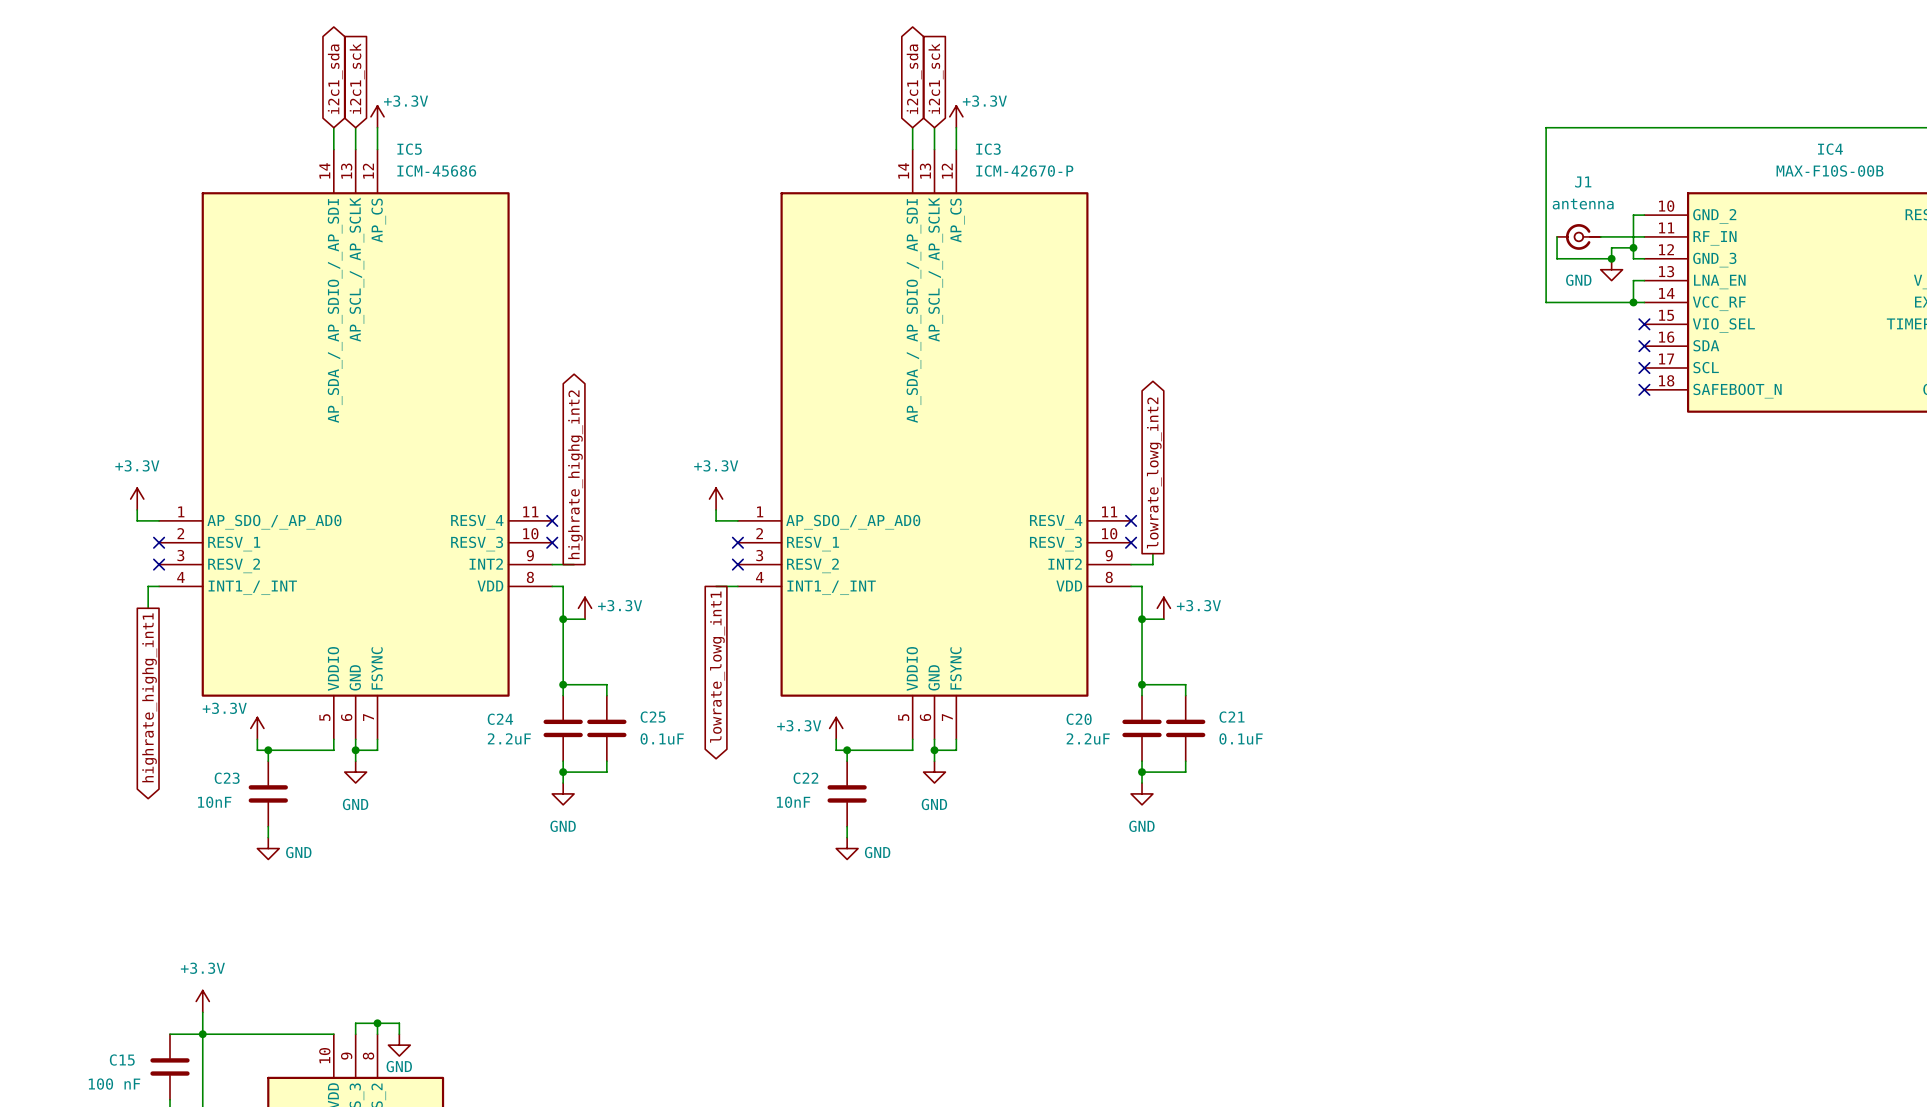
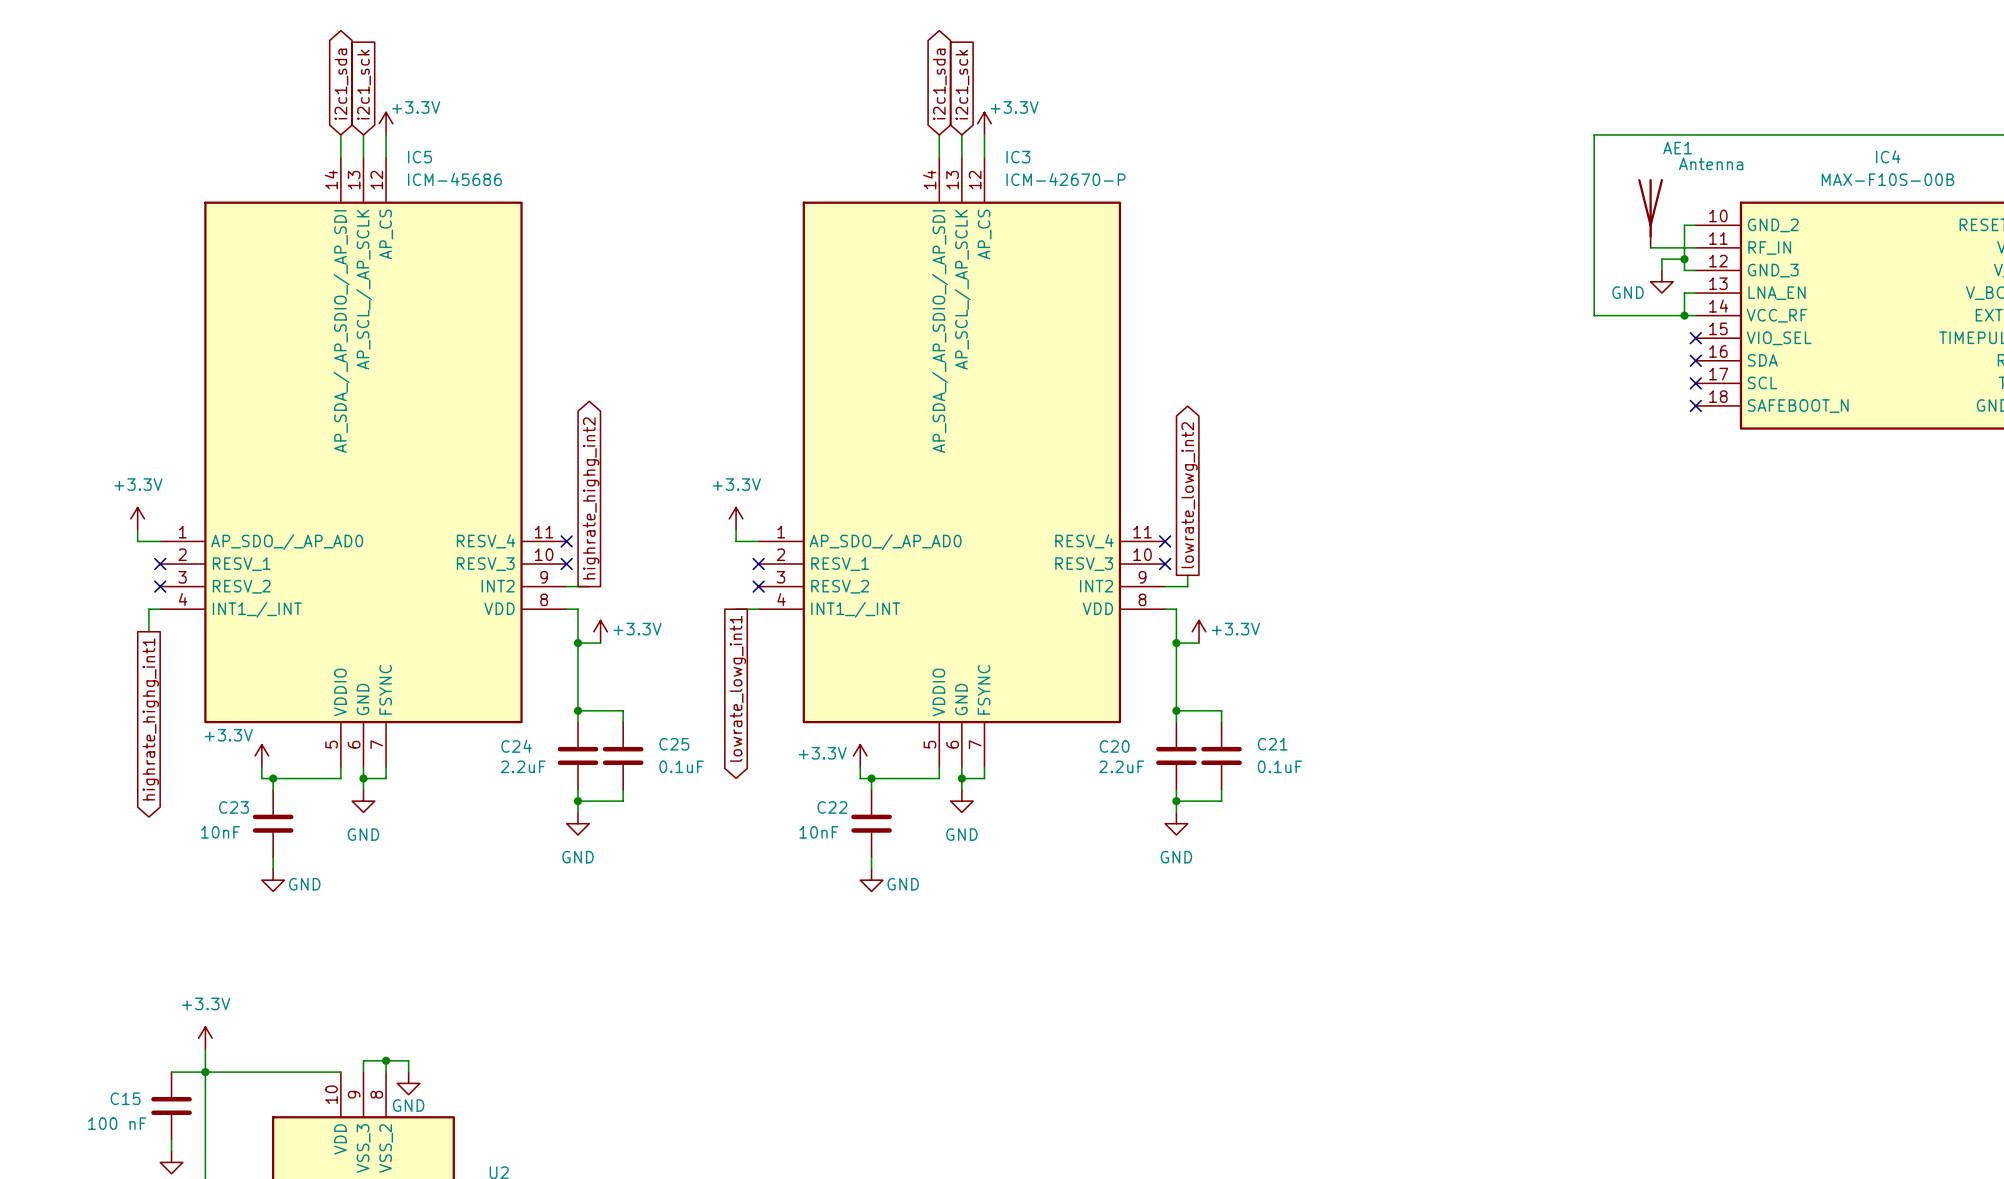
AE1: none -> Antenna (1650, 213)
wire: (1557, 236) (1557, 258) (1611, 258) -> none
J1: antenna (1578, 236) -> none
junction: (1611, 258) -> none

